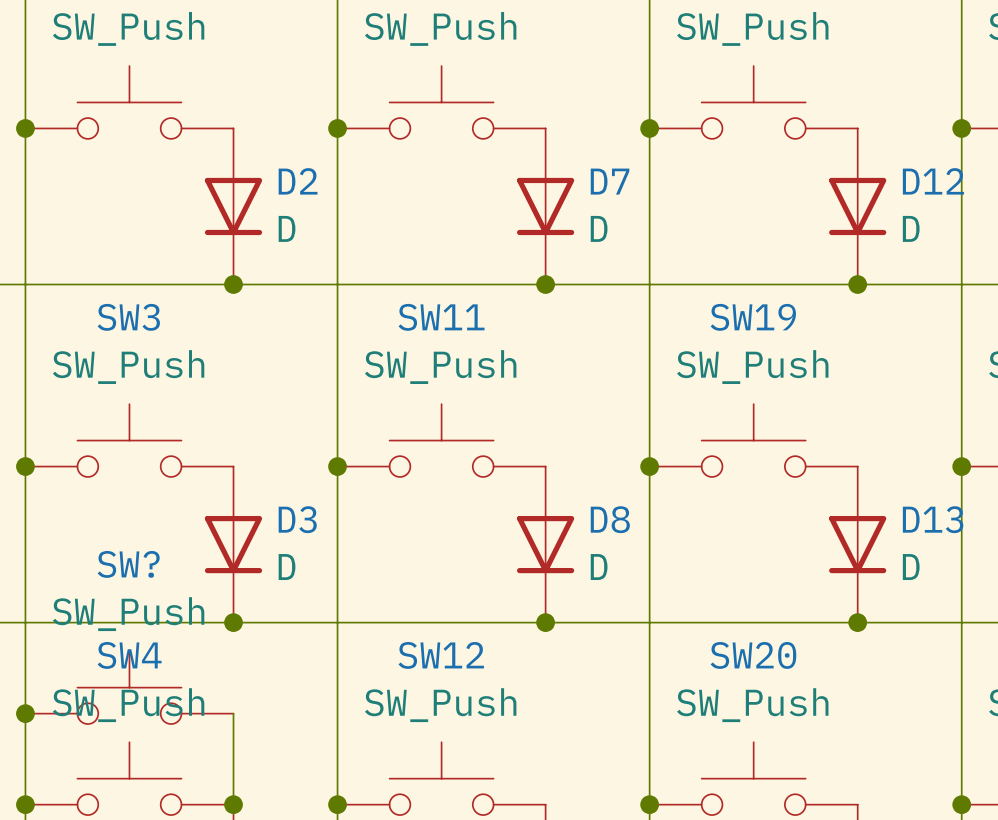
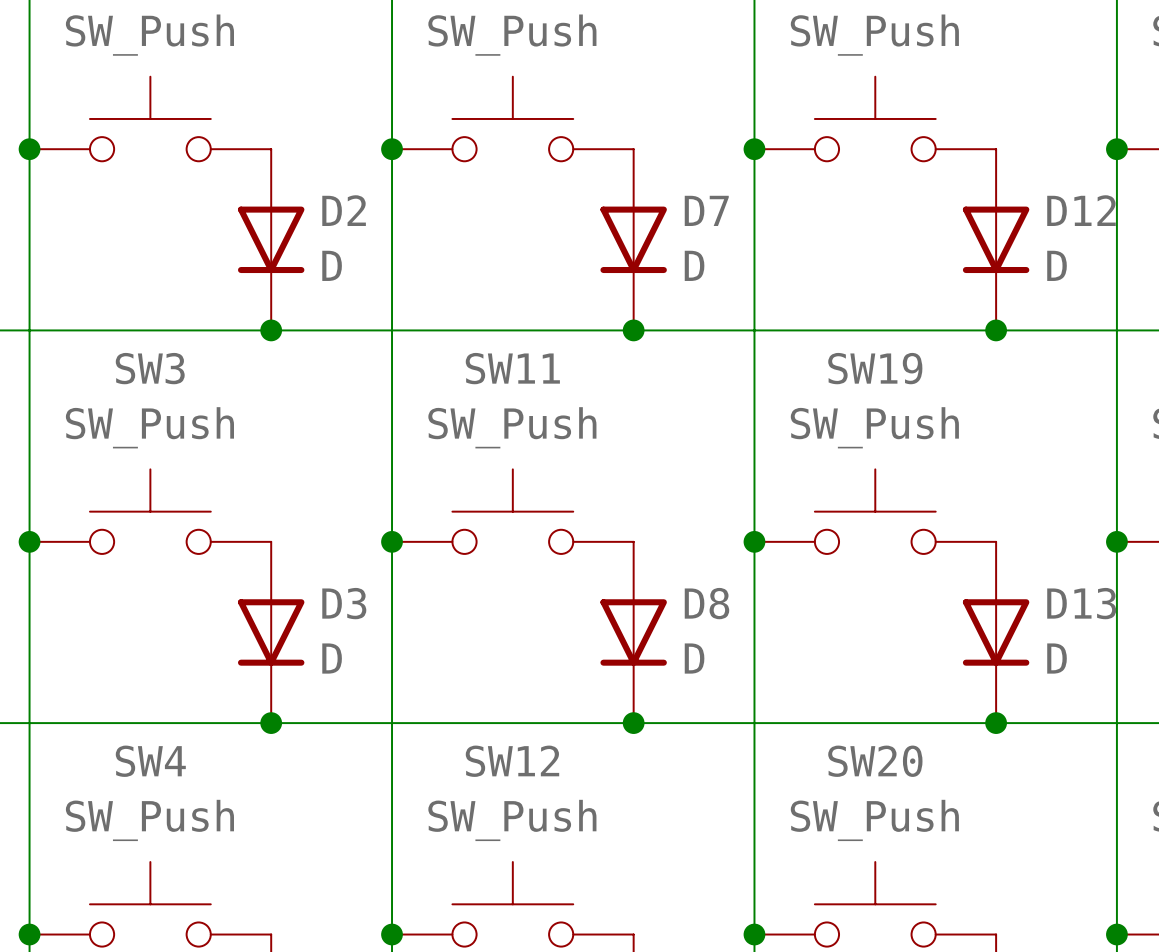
SW?: SW_Push (129, 687) -> none
junction: (25, 713) -> none
wire: (233, 713) (233, 804) -> none
junction: (233, 804) -> none

